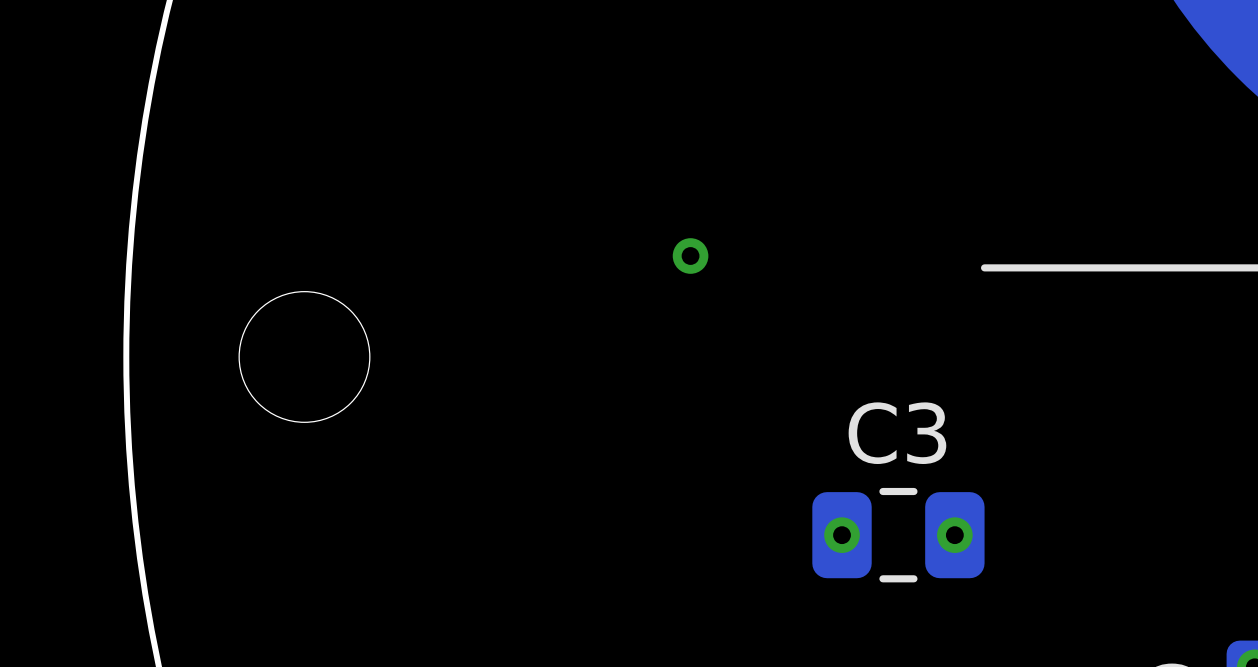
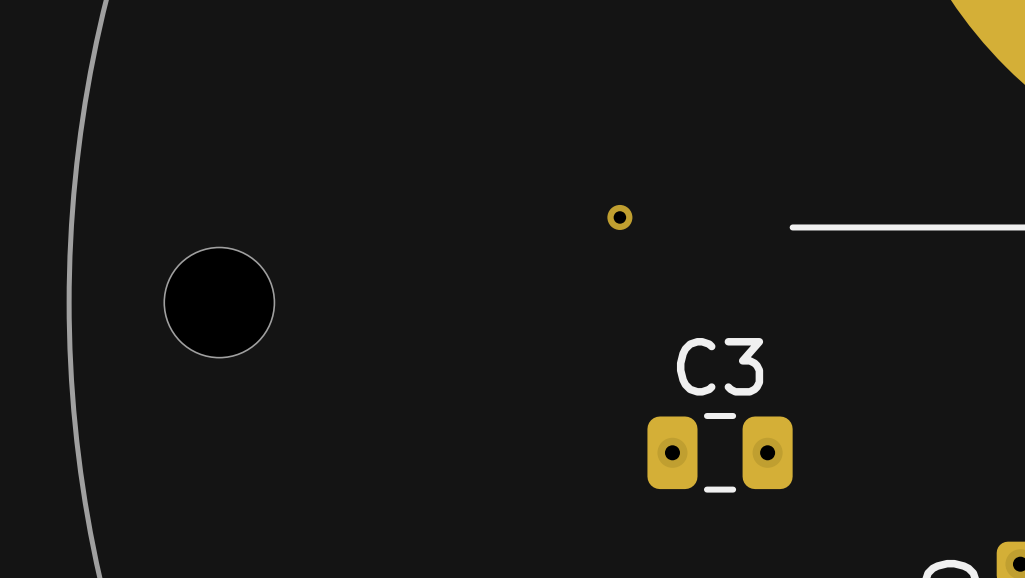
via: (690, 256) -> none
via: none -> (619, 217)

